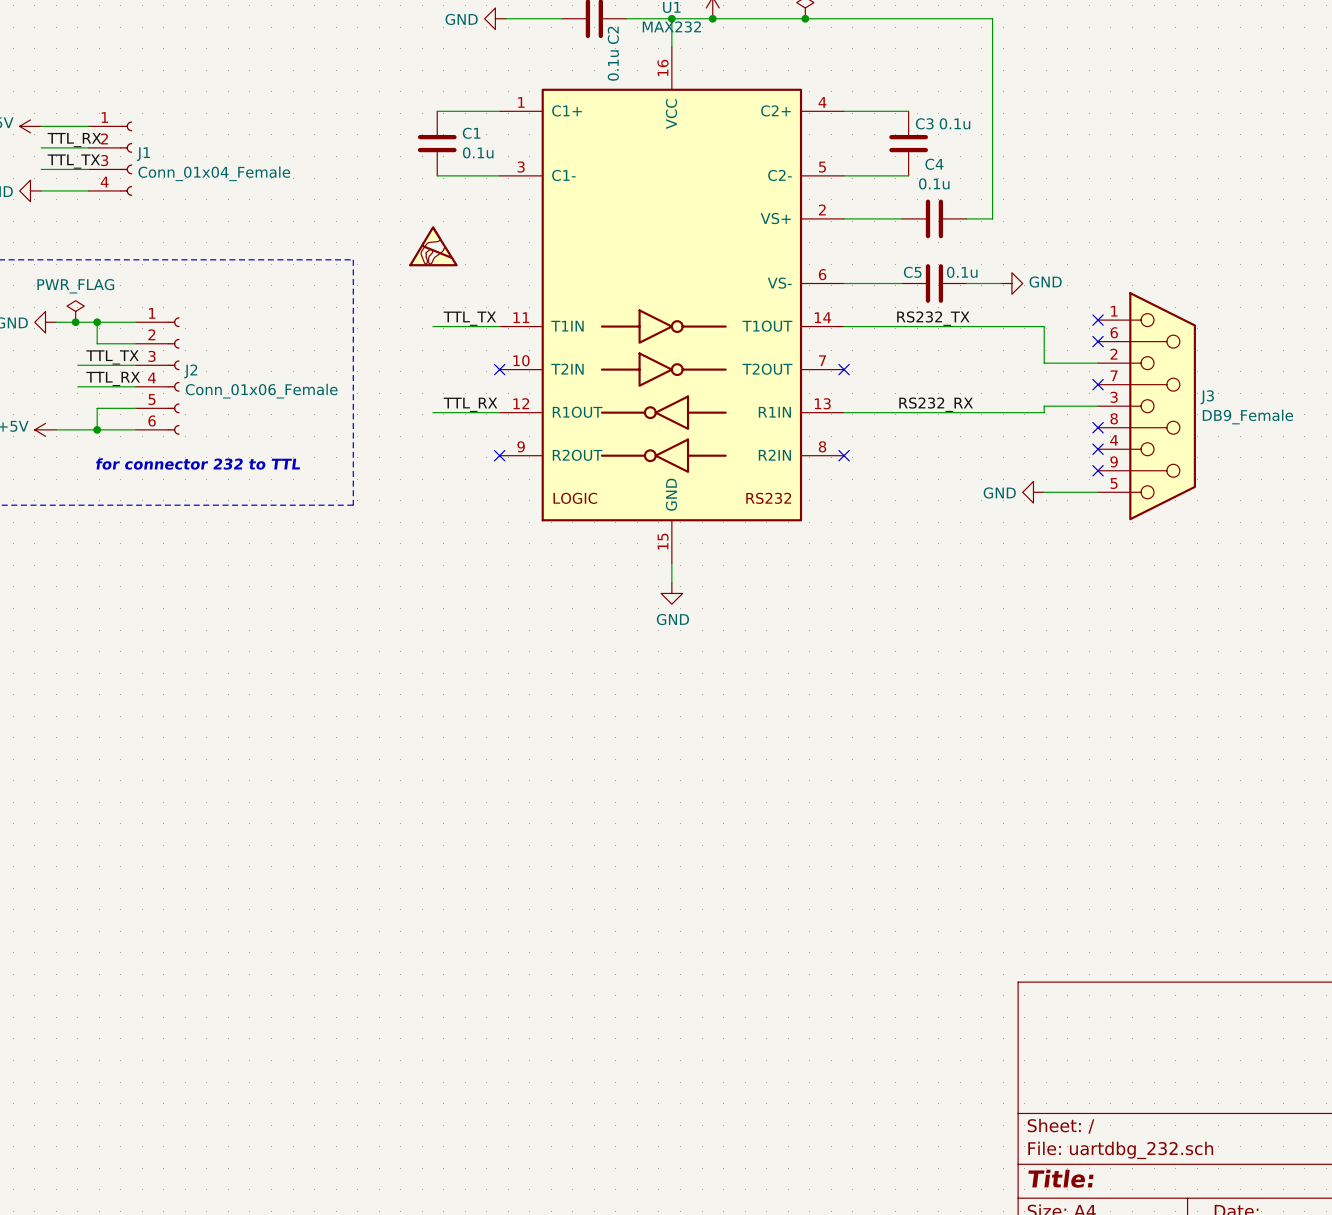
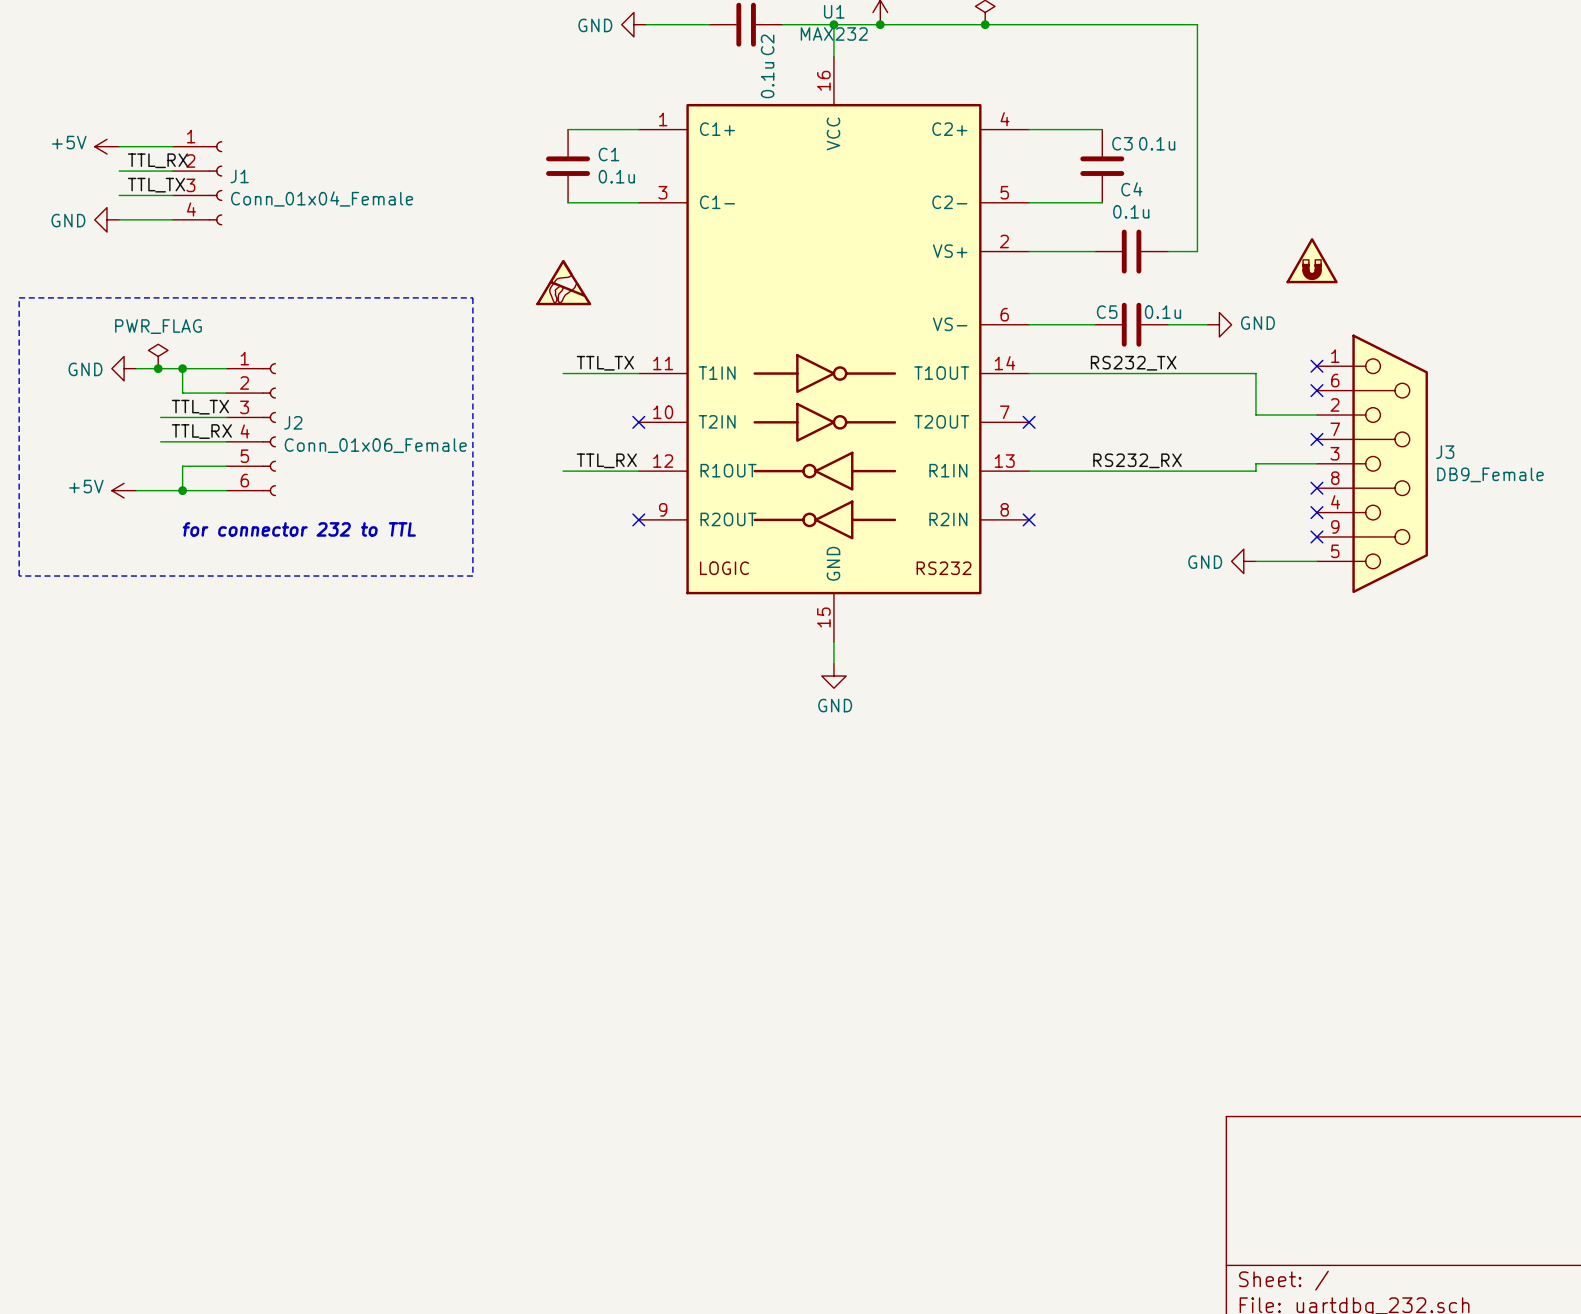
part: none -> (1312, 260)

